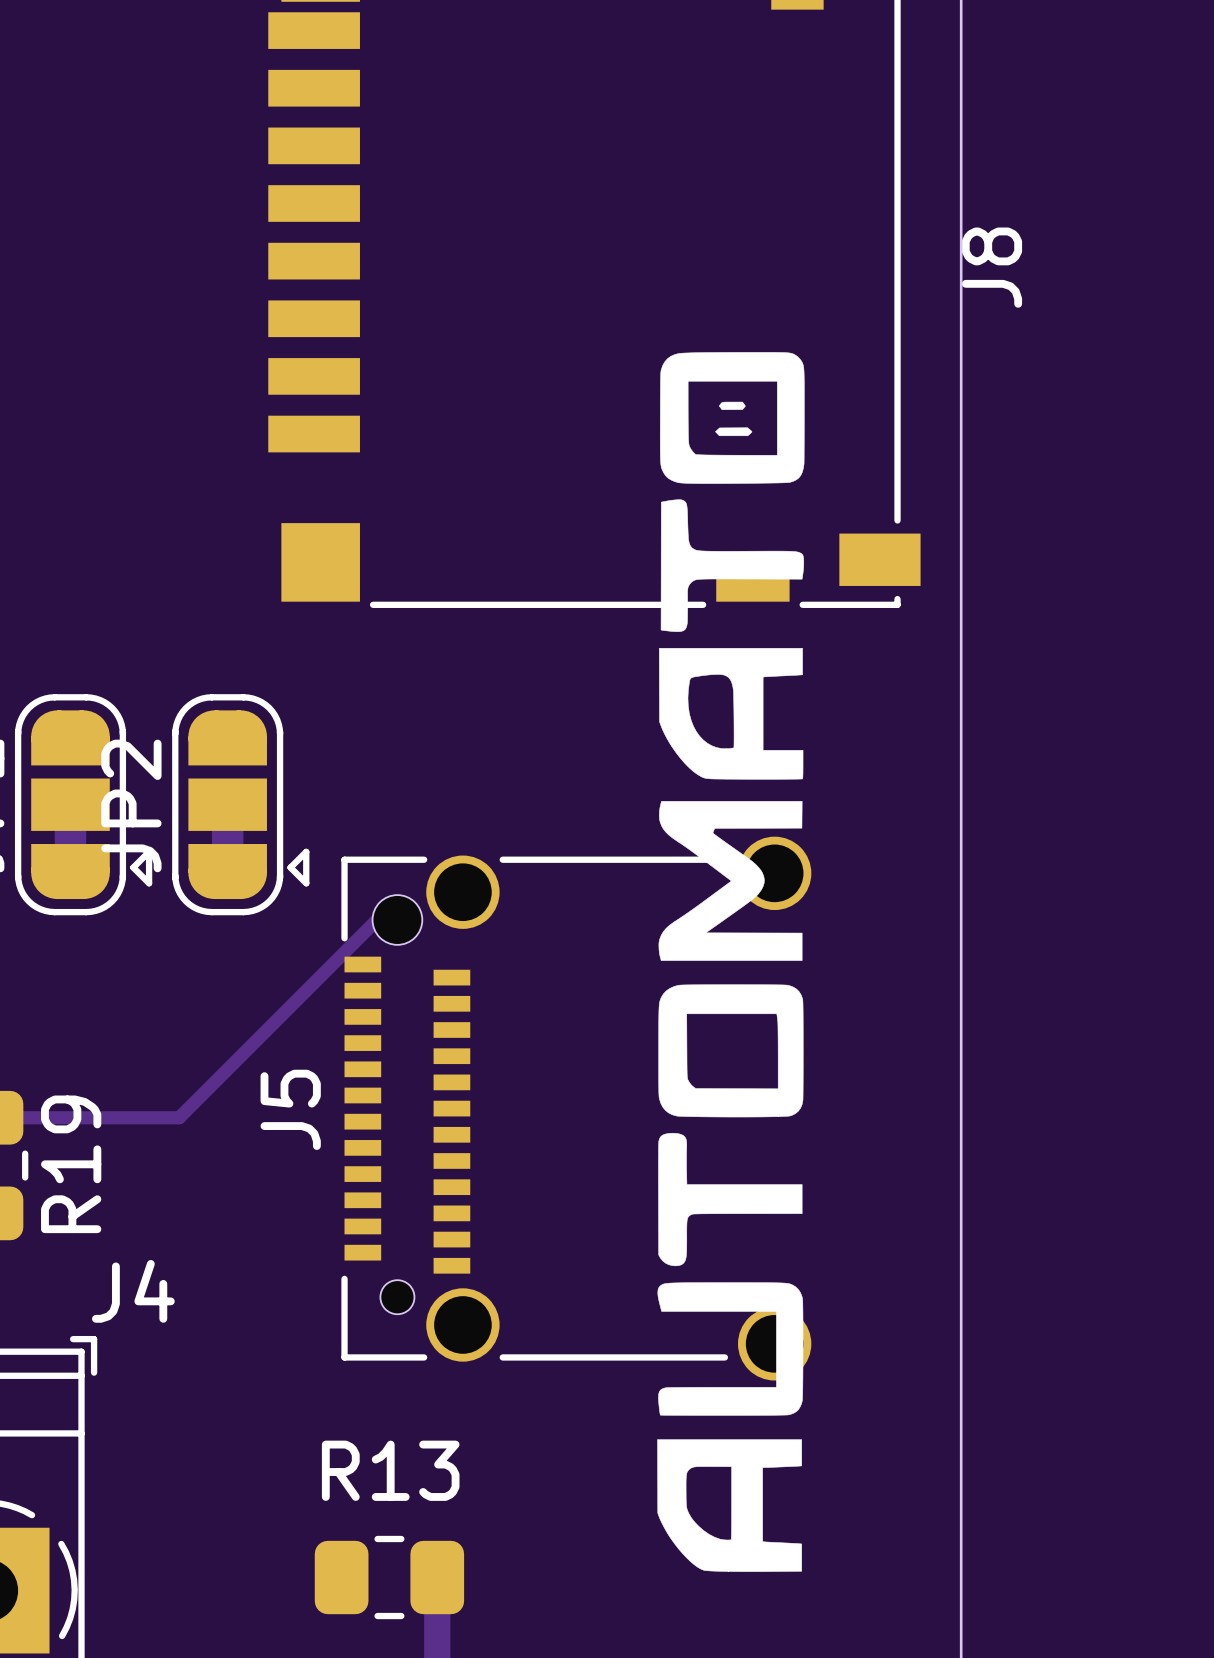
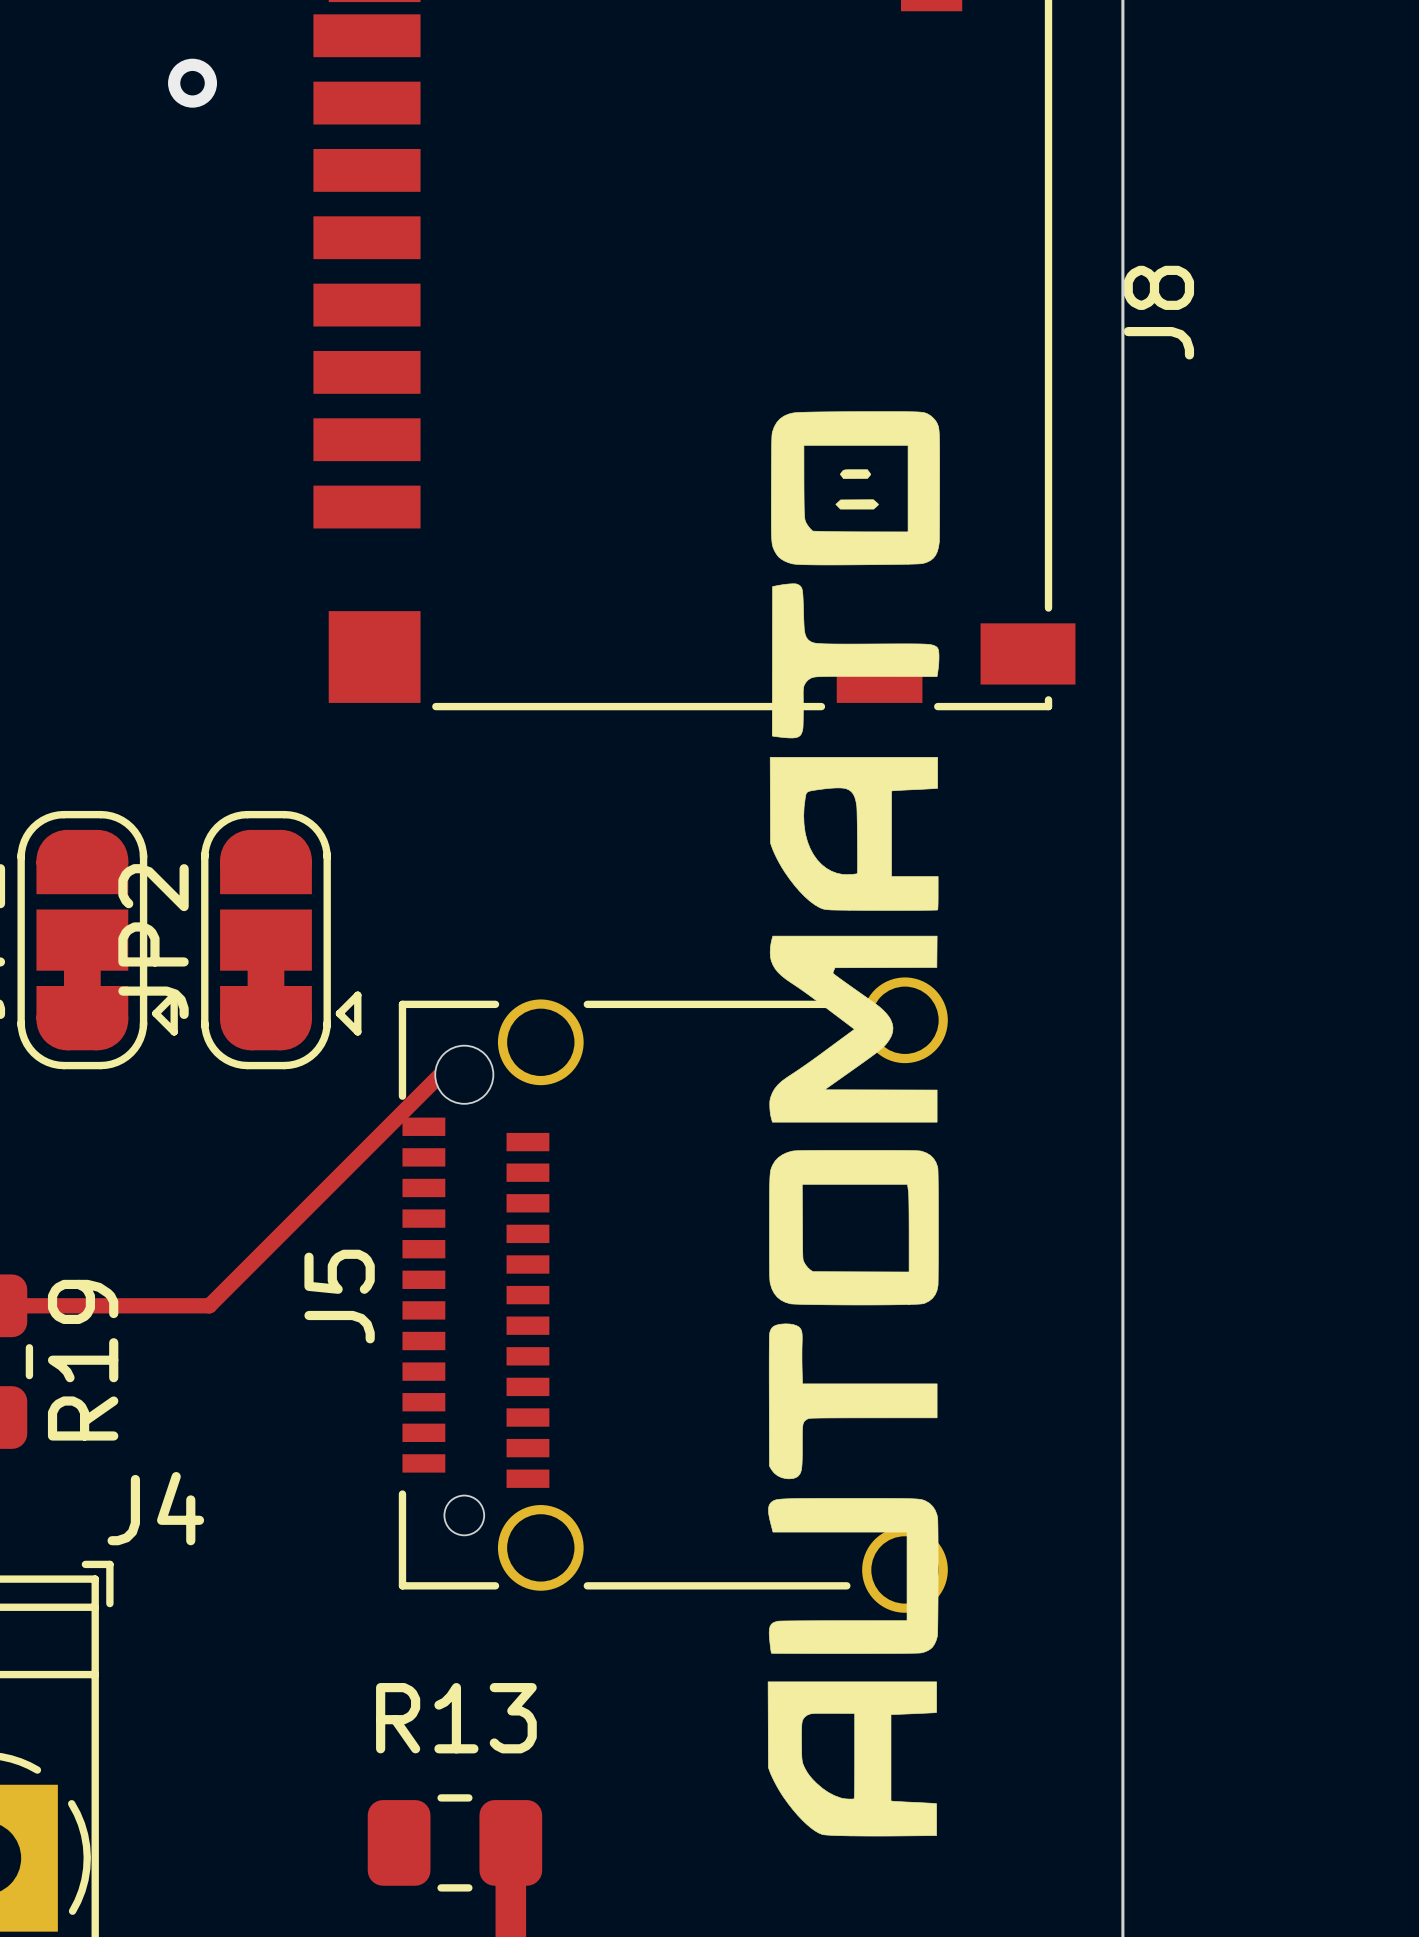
via: none -> (192, 83)

